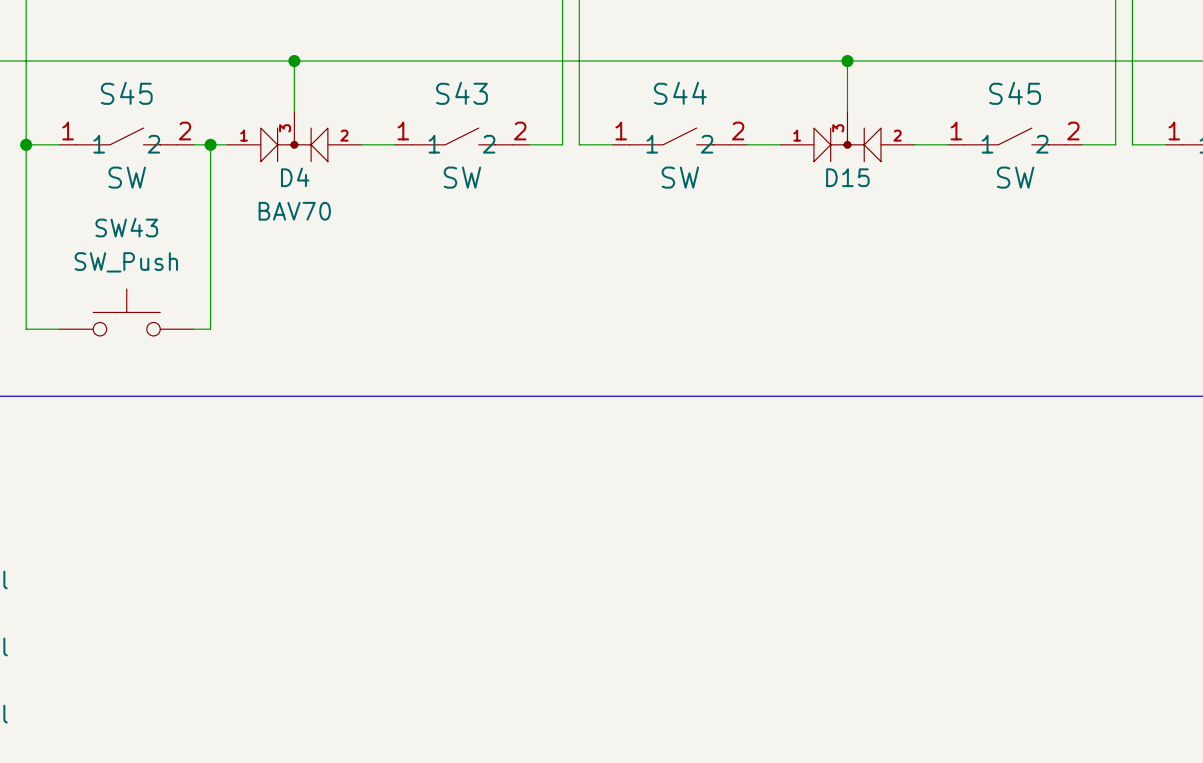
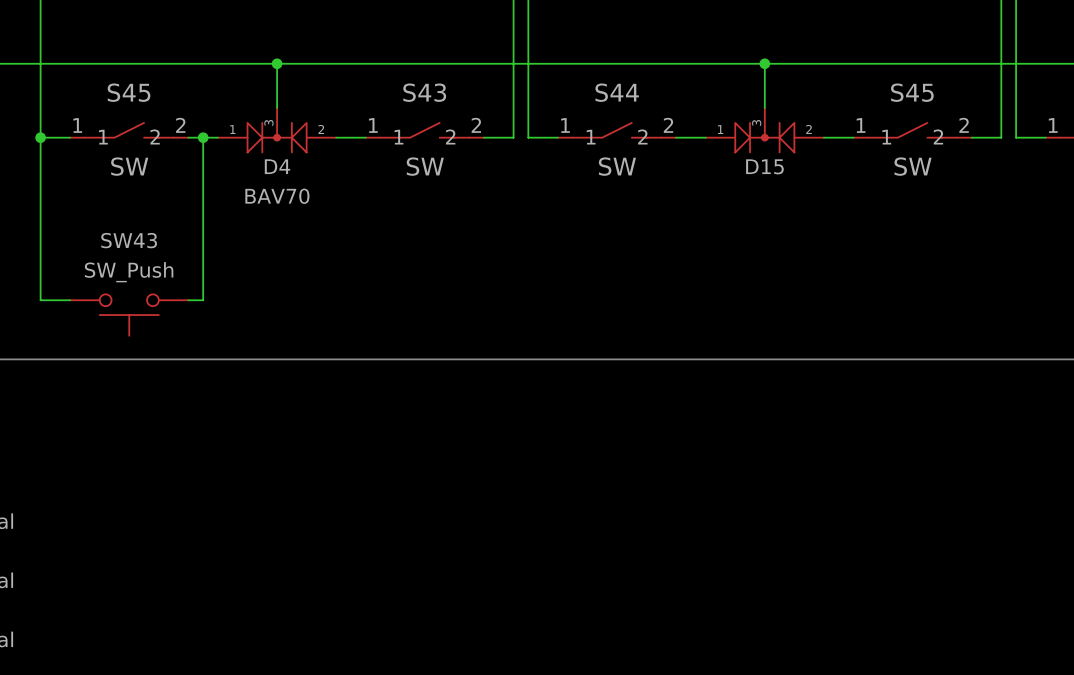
SW43 rotation: 0° (126, 312) -> 180° (129, 315)

